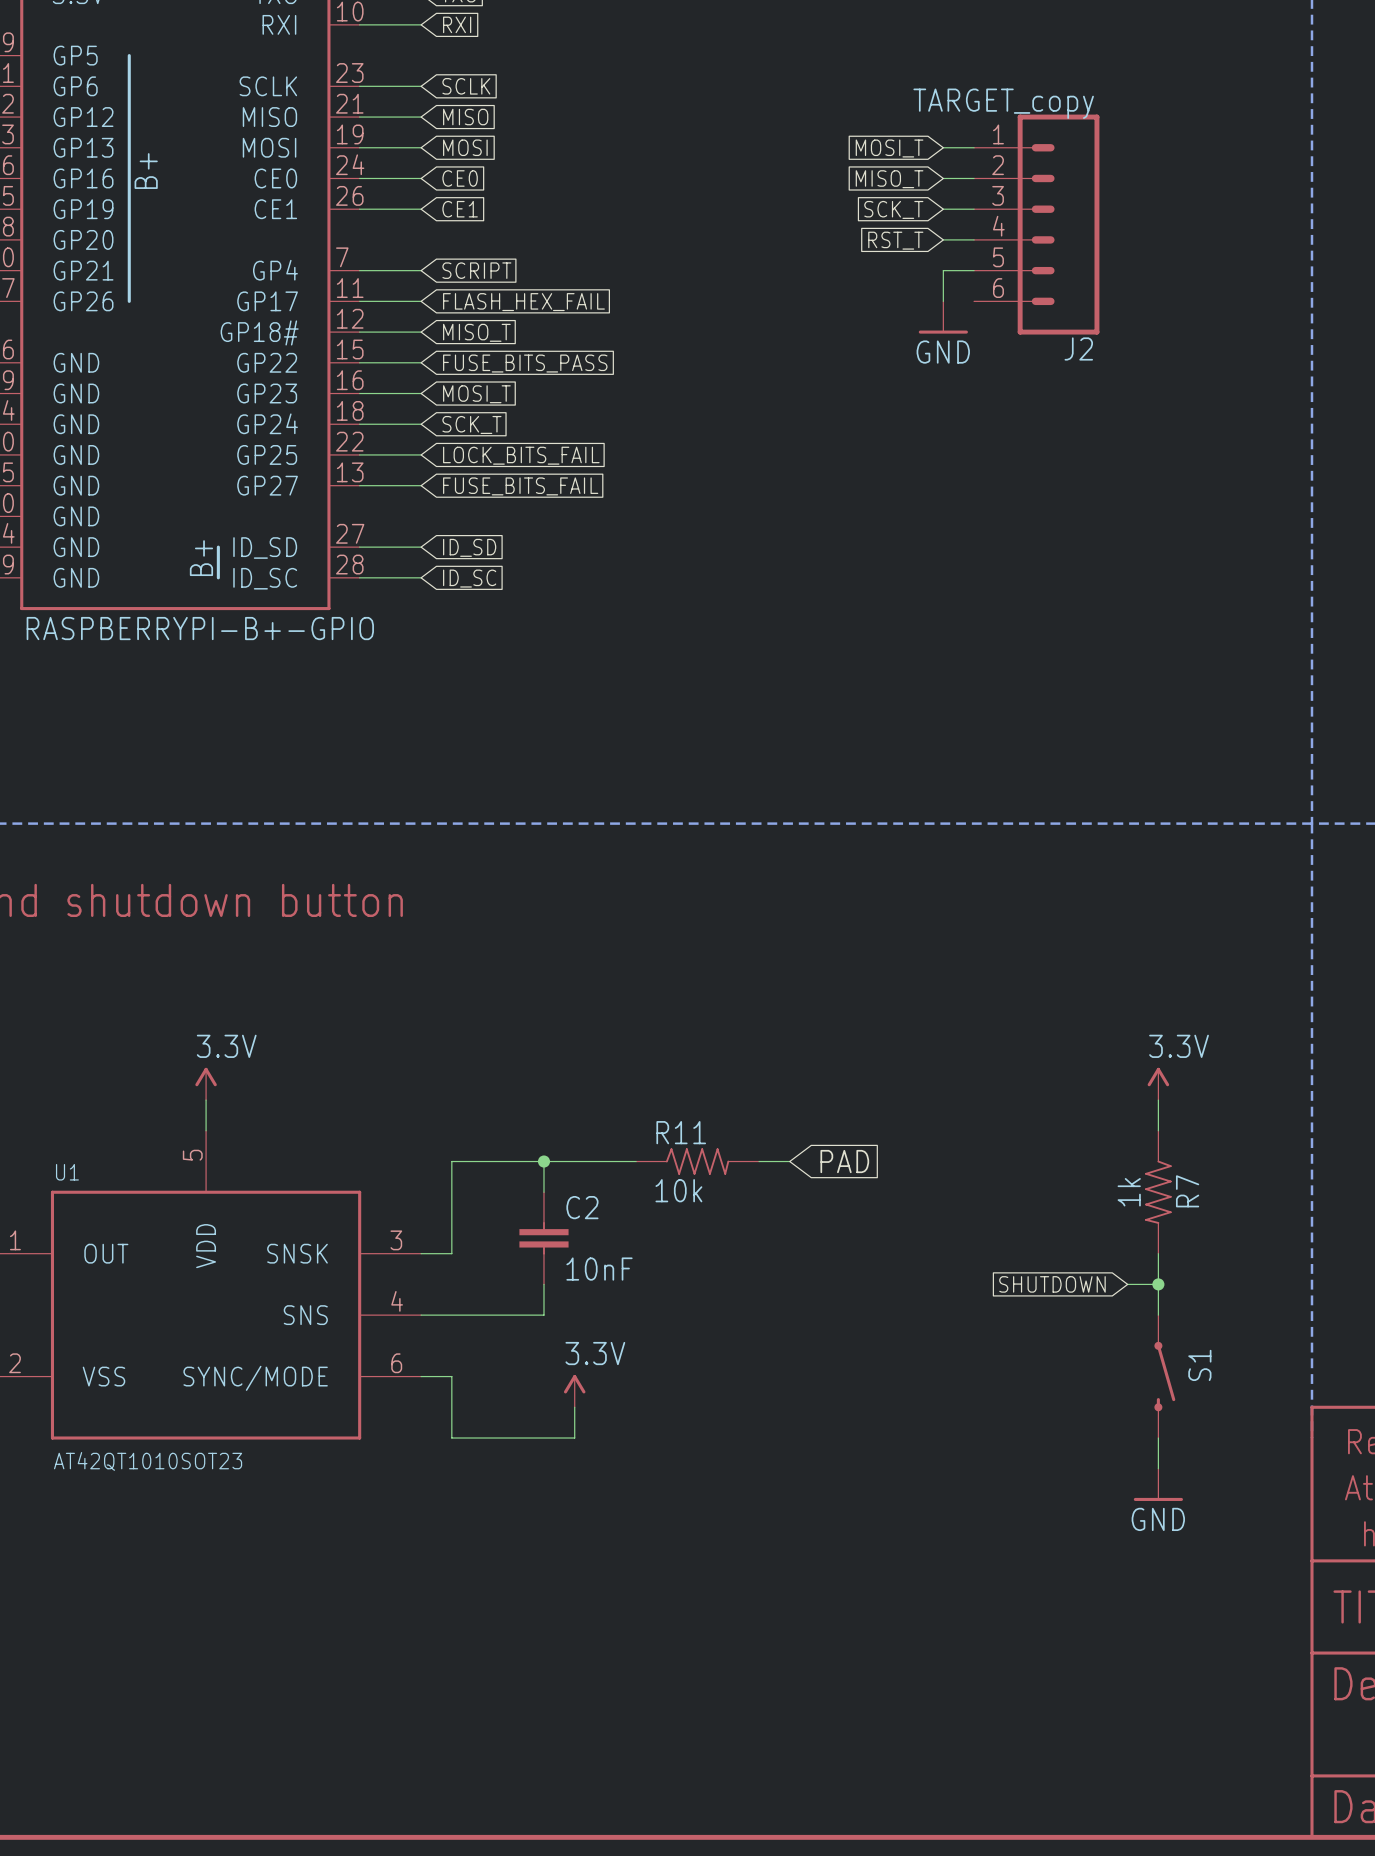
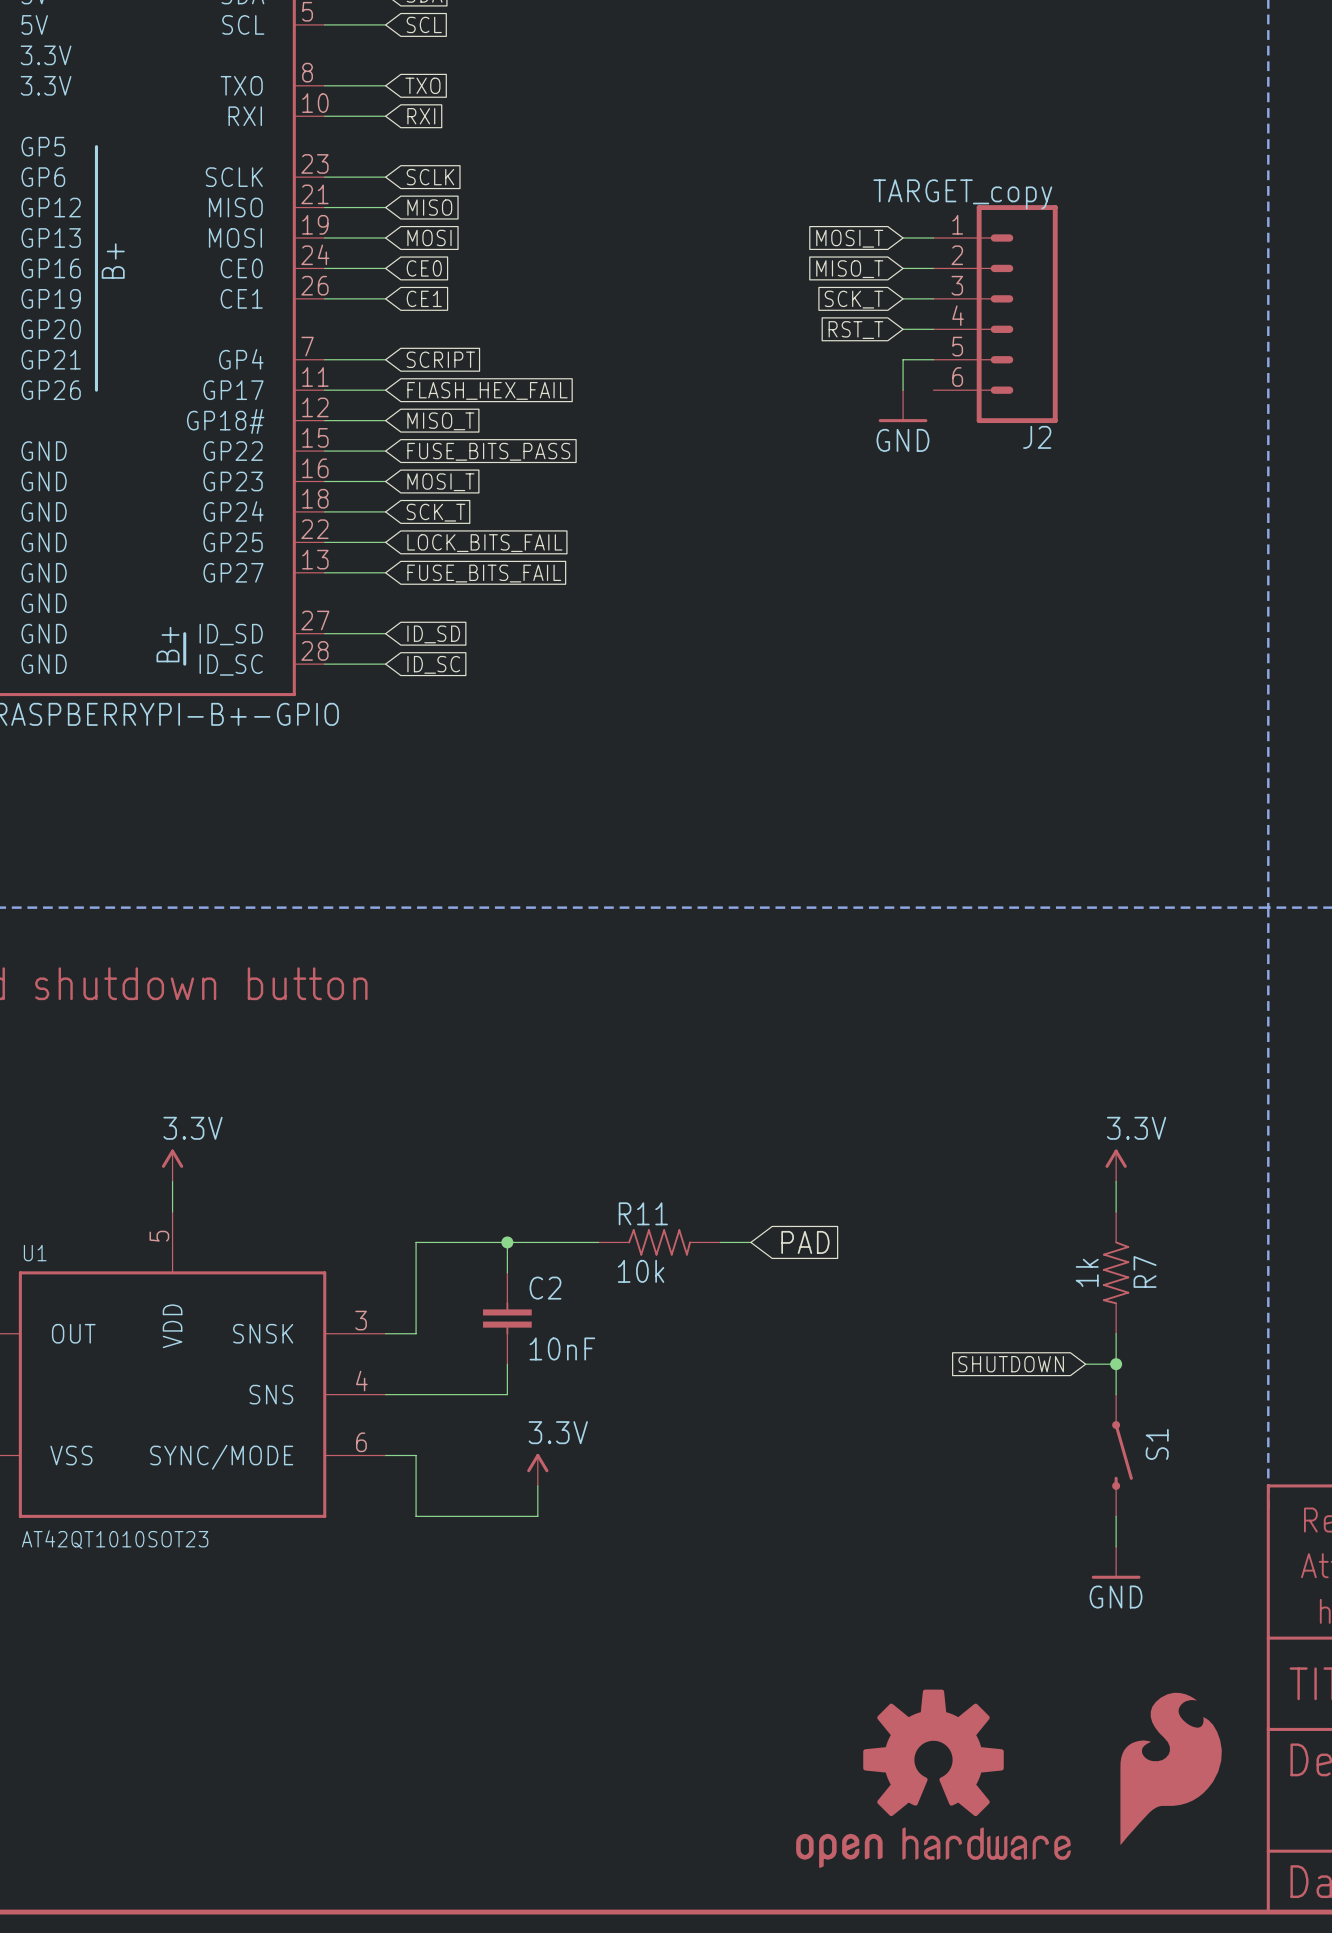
part: none -> (1171, 1768)
part: none -> (933, 1778)

